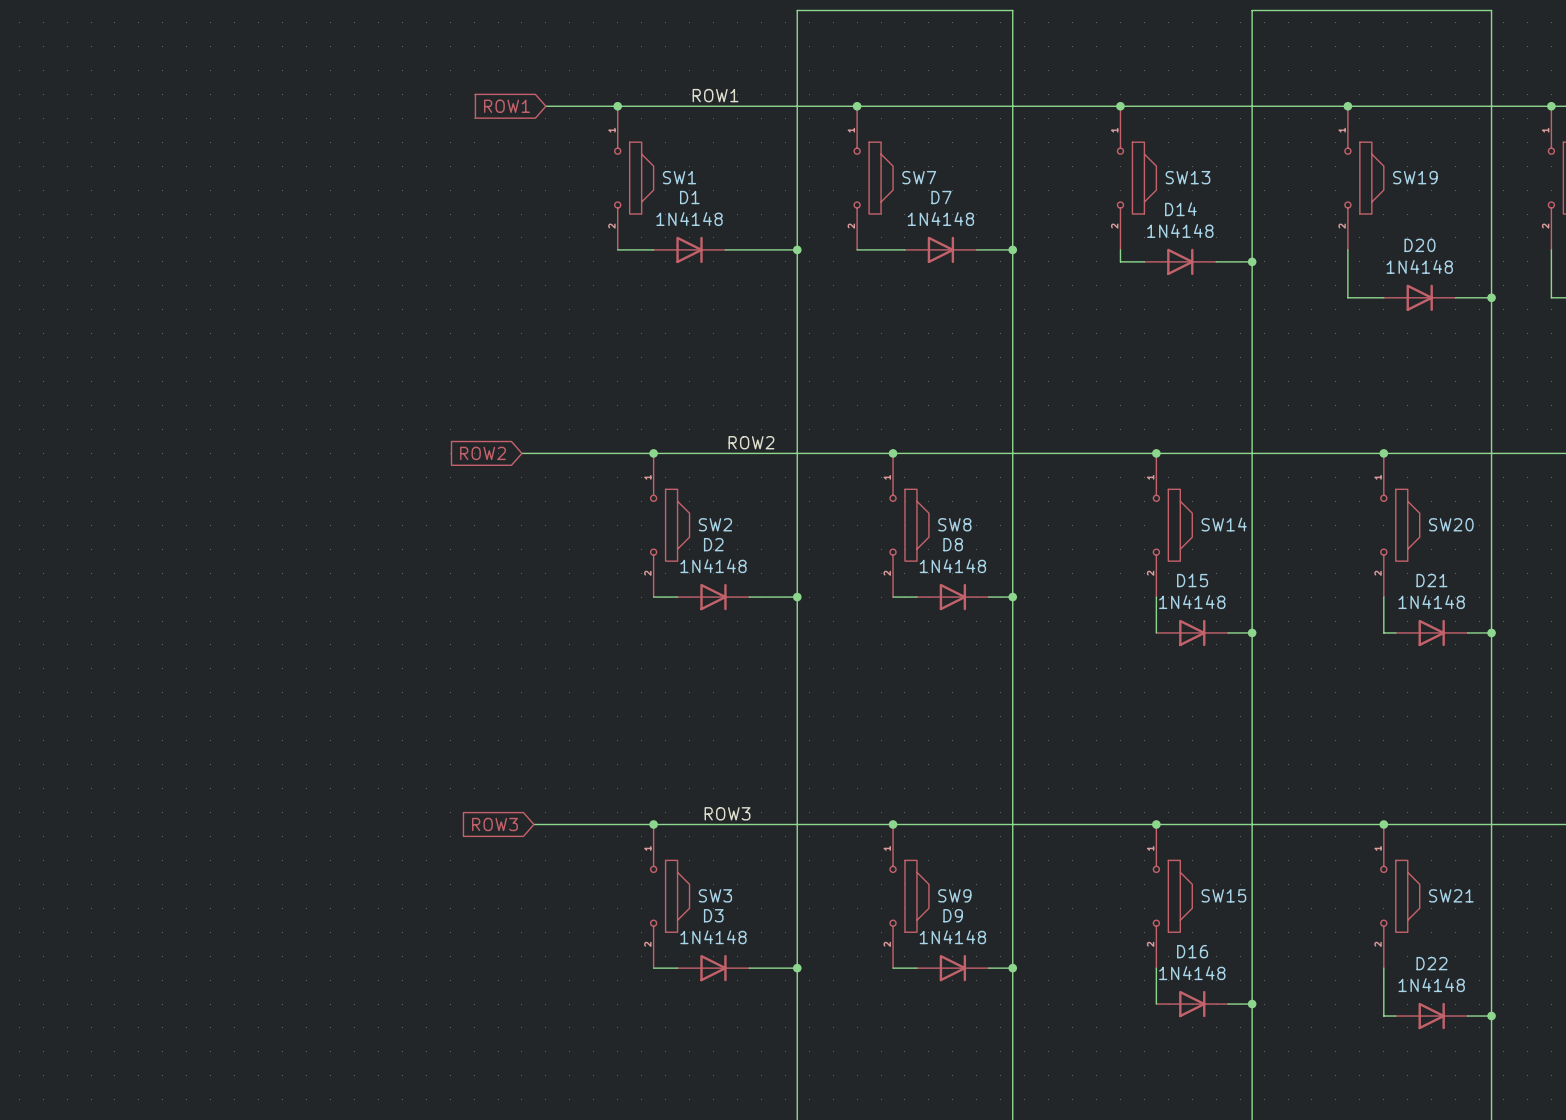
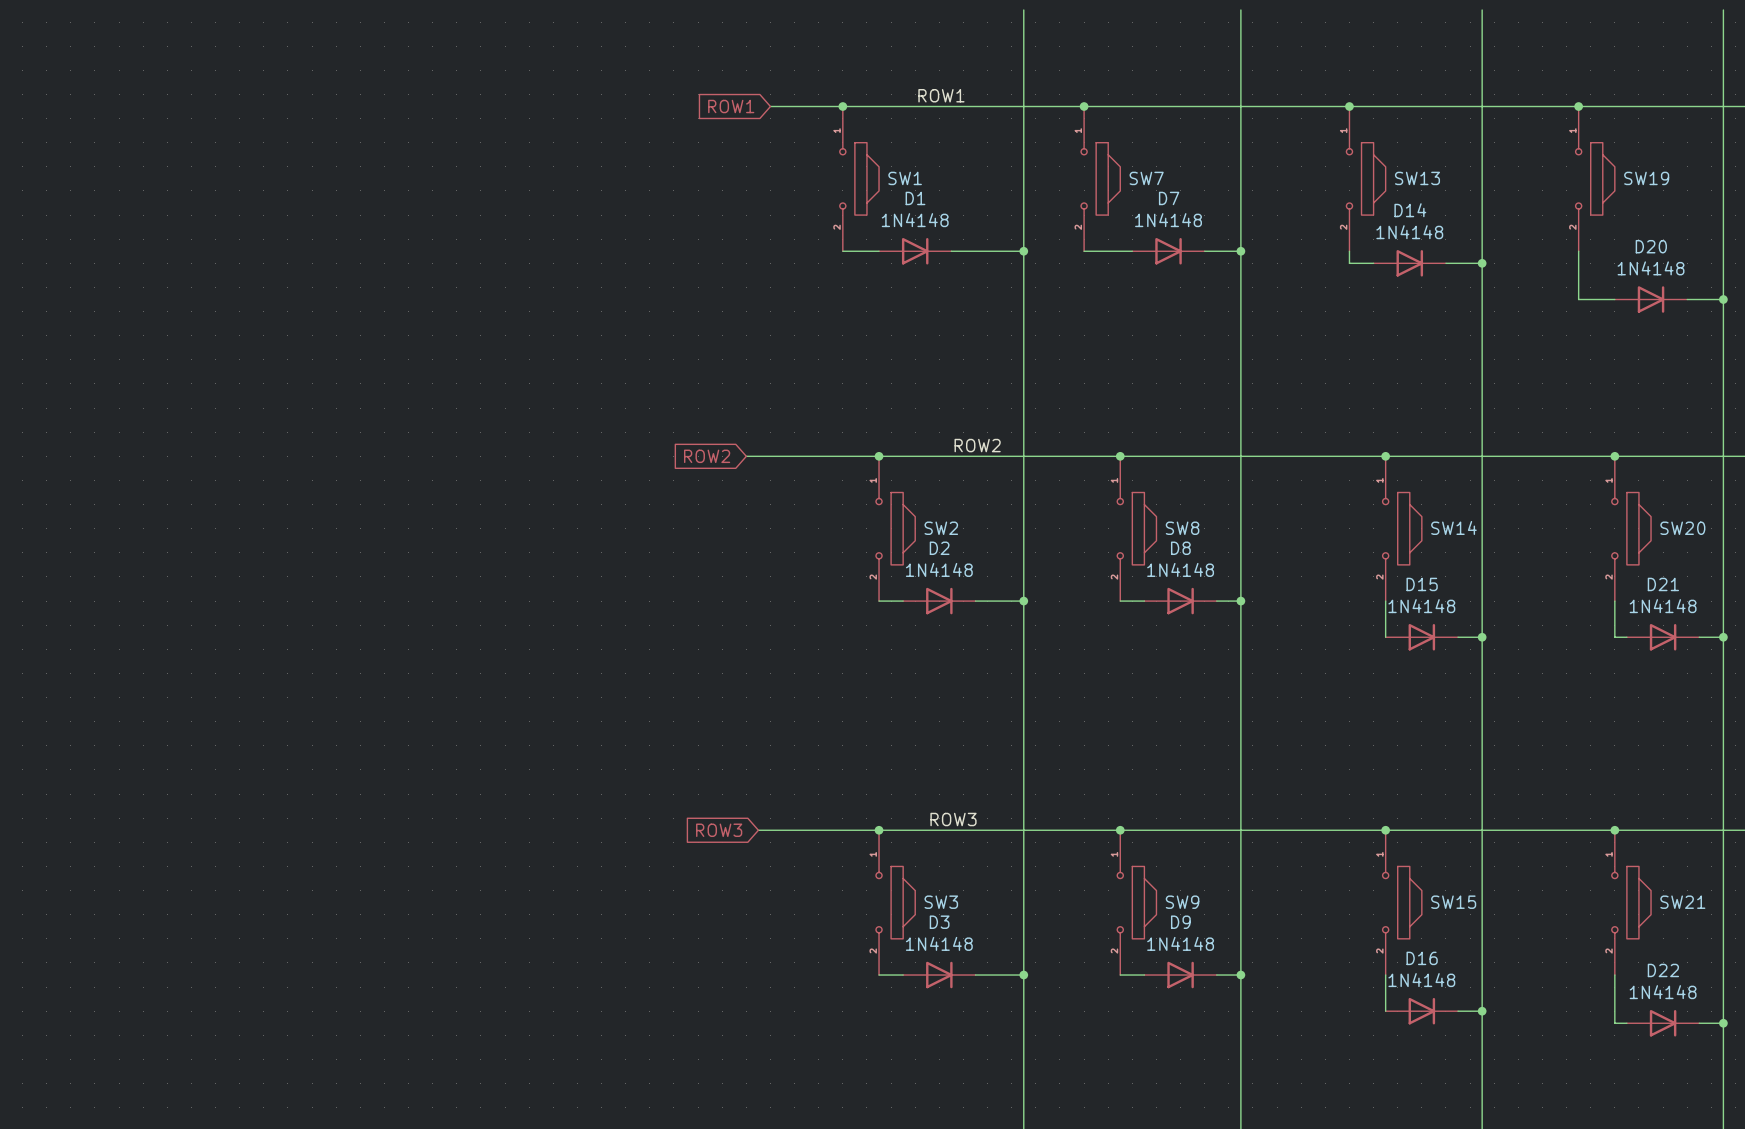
wire: (797, 10) (1012, 10) -> none
wire: (1252, 10) (1491, 10) -> none

